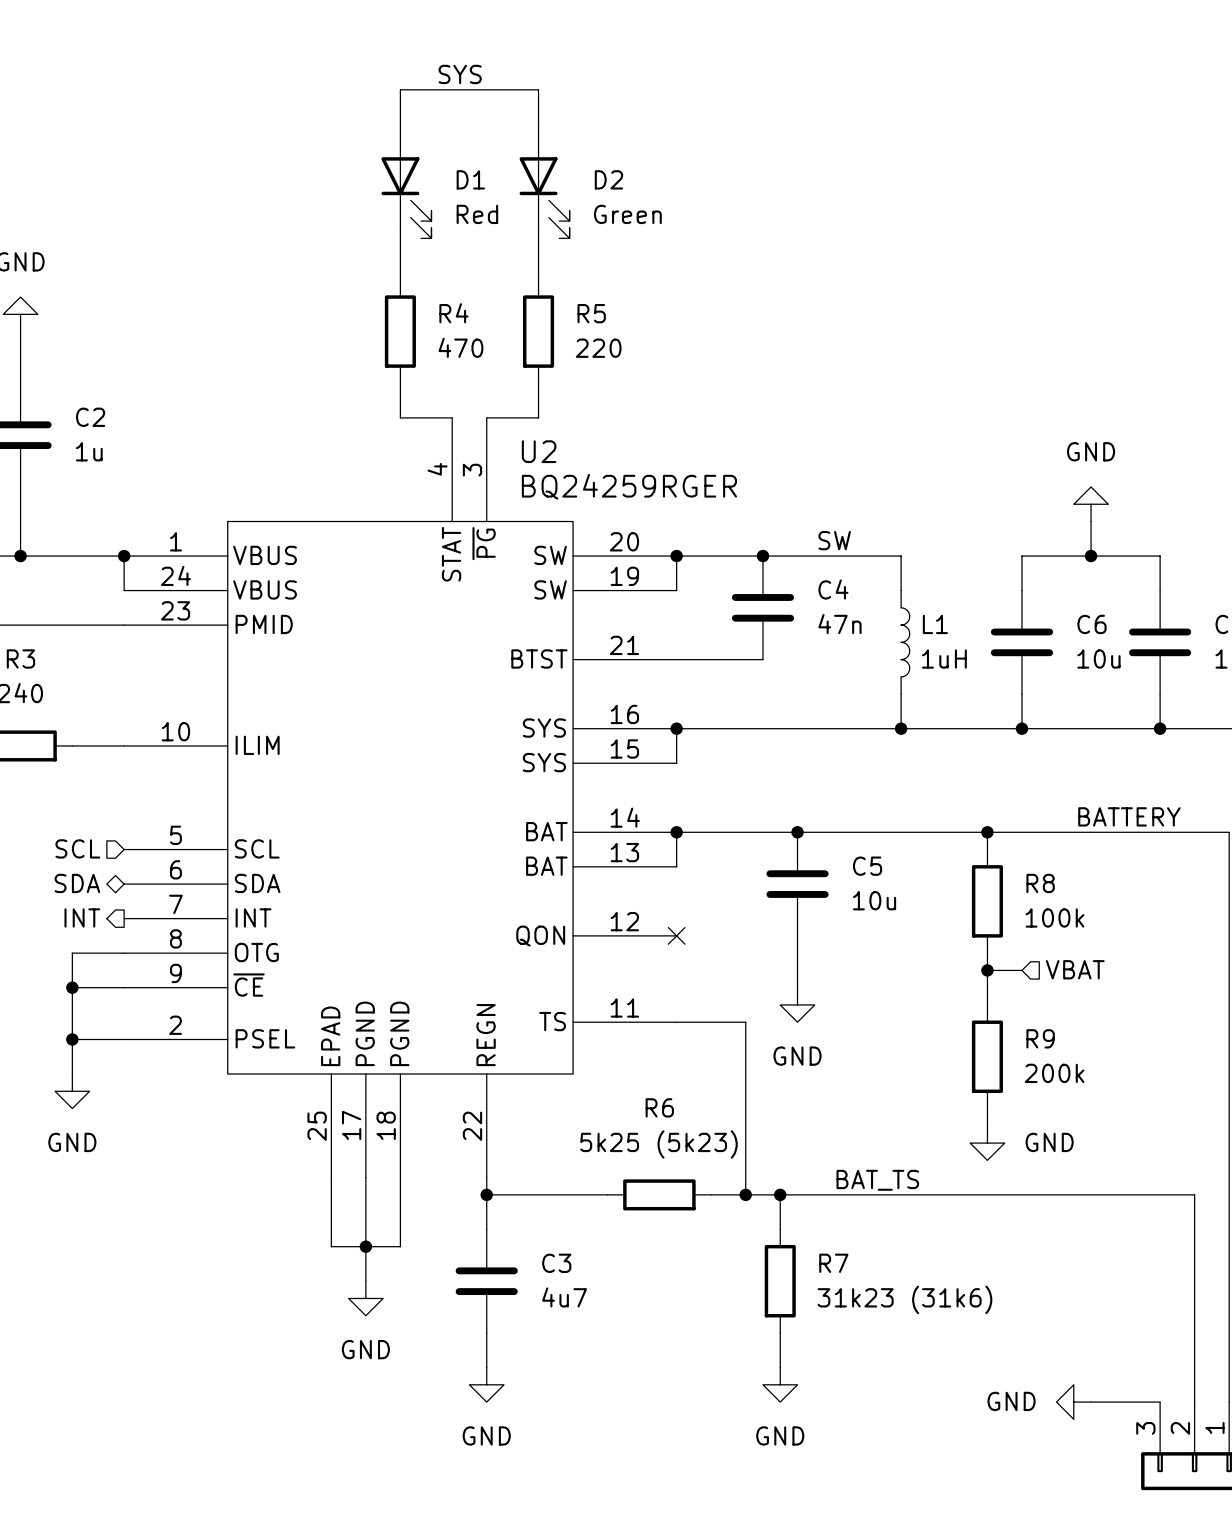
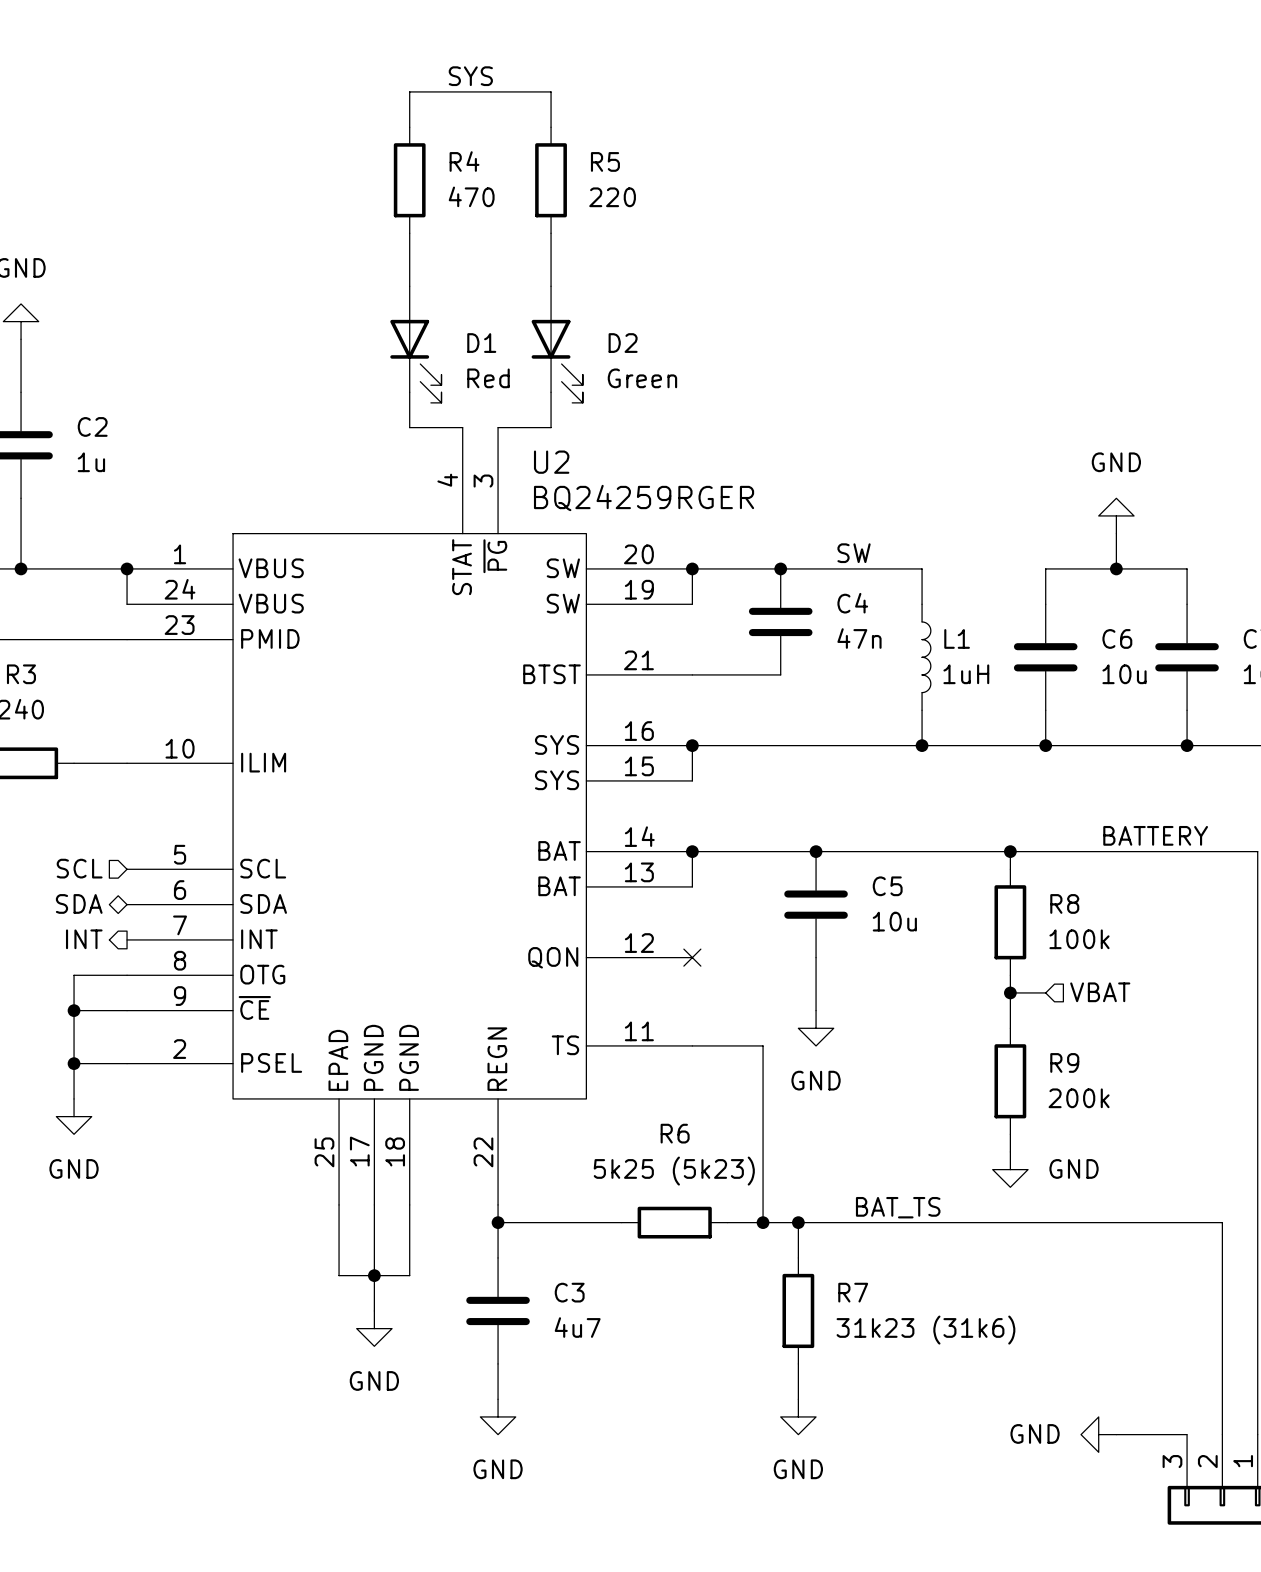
D1 position: (406, 181) -> (415, 344)
D2 position: (544, 181) -> (557, 344)
R4 position: (400, 331) -> (409, 180)
R5 position: (538, 331) -> (551, 180)

